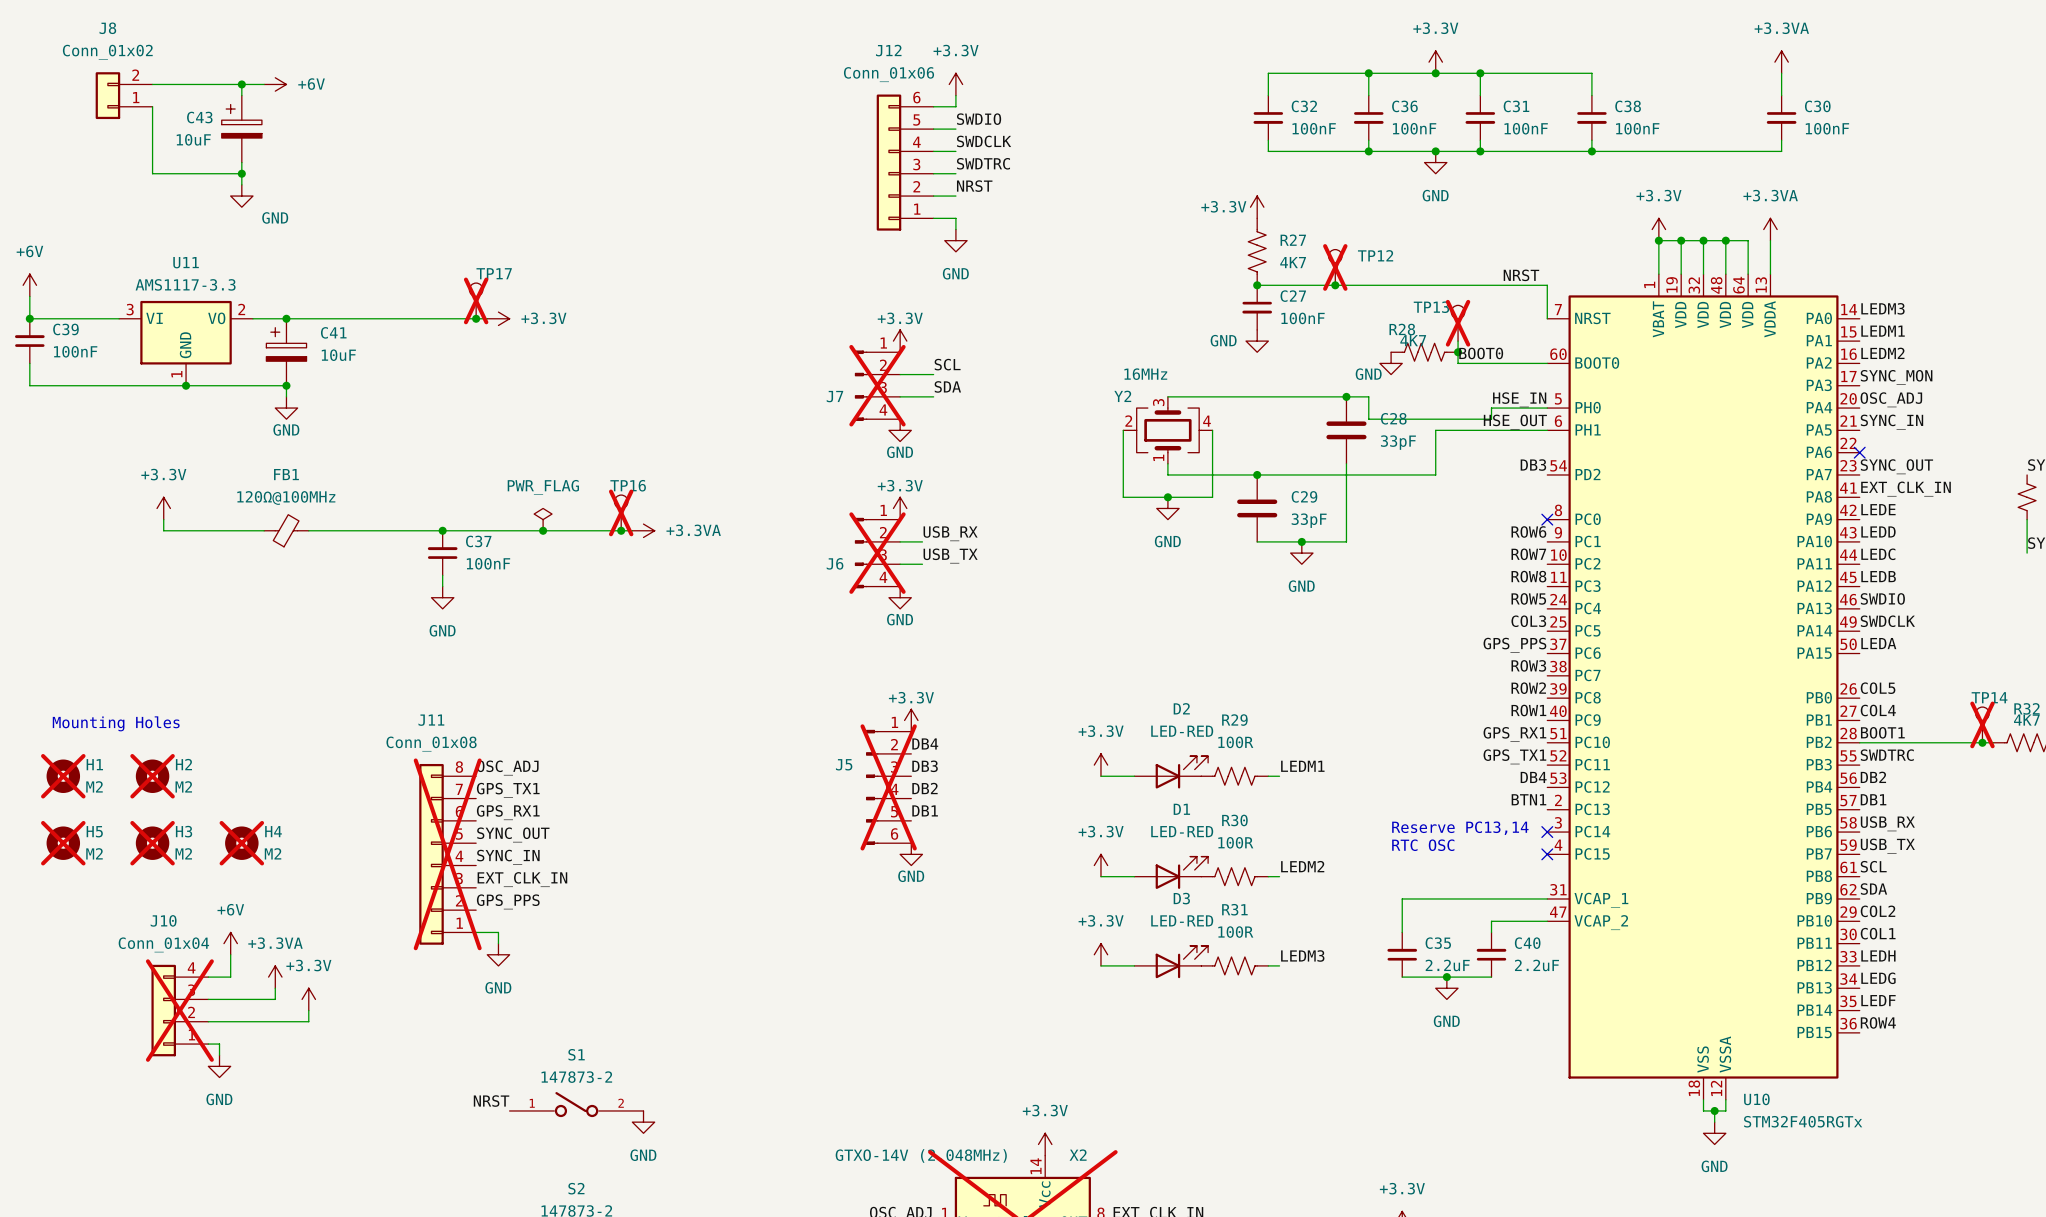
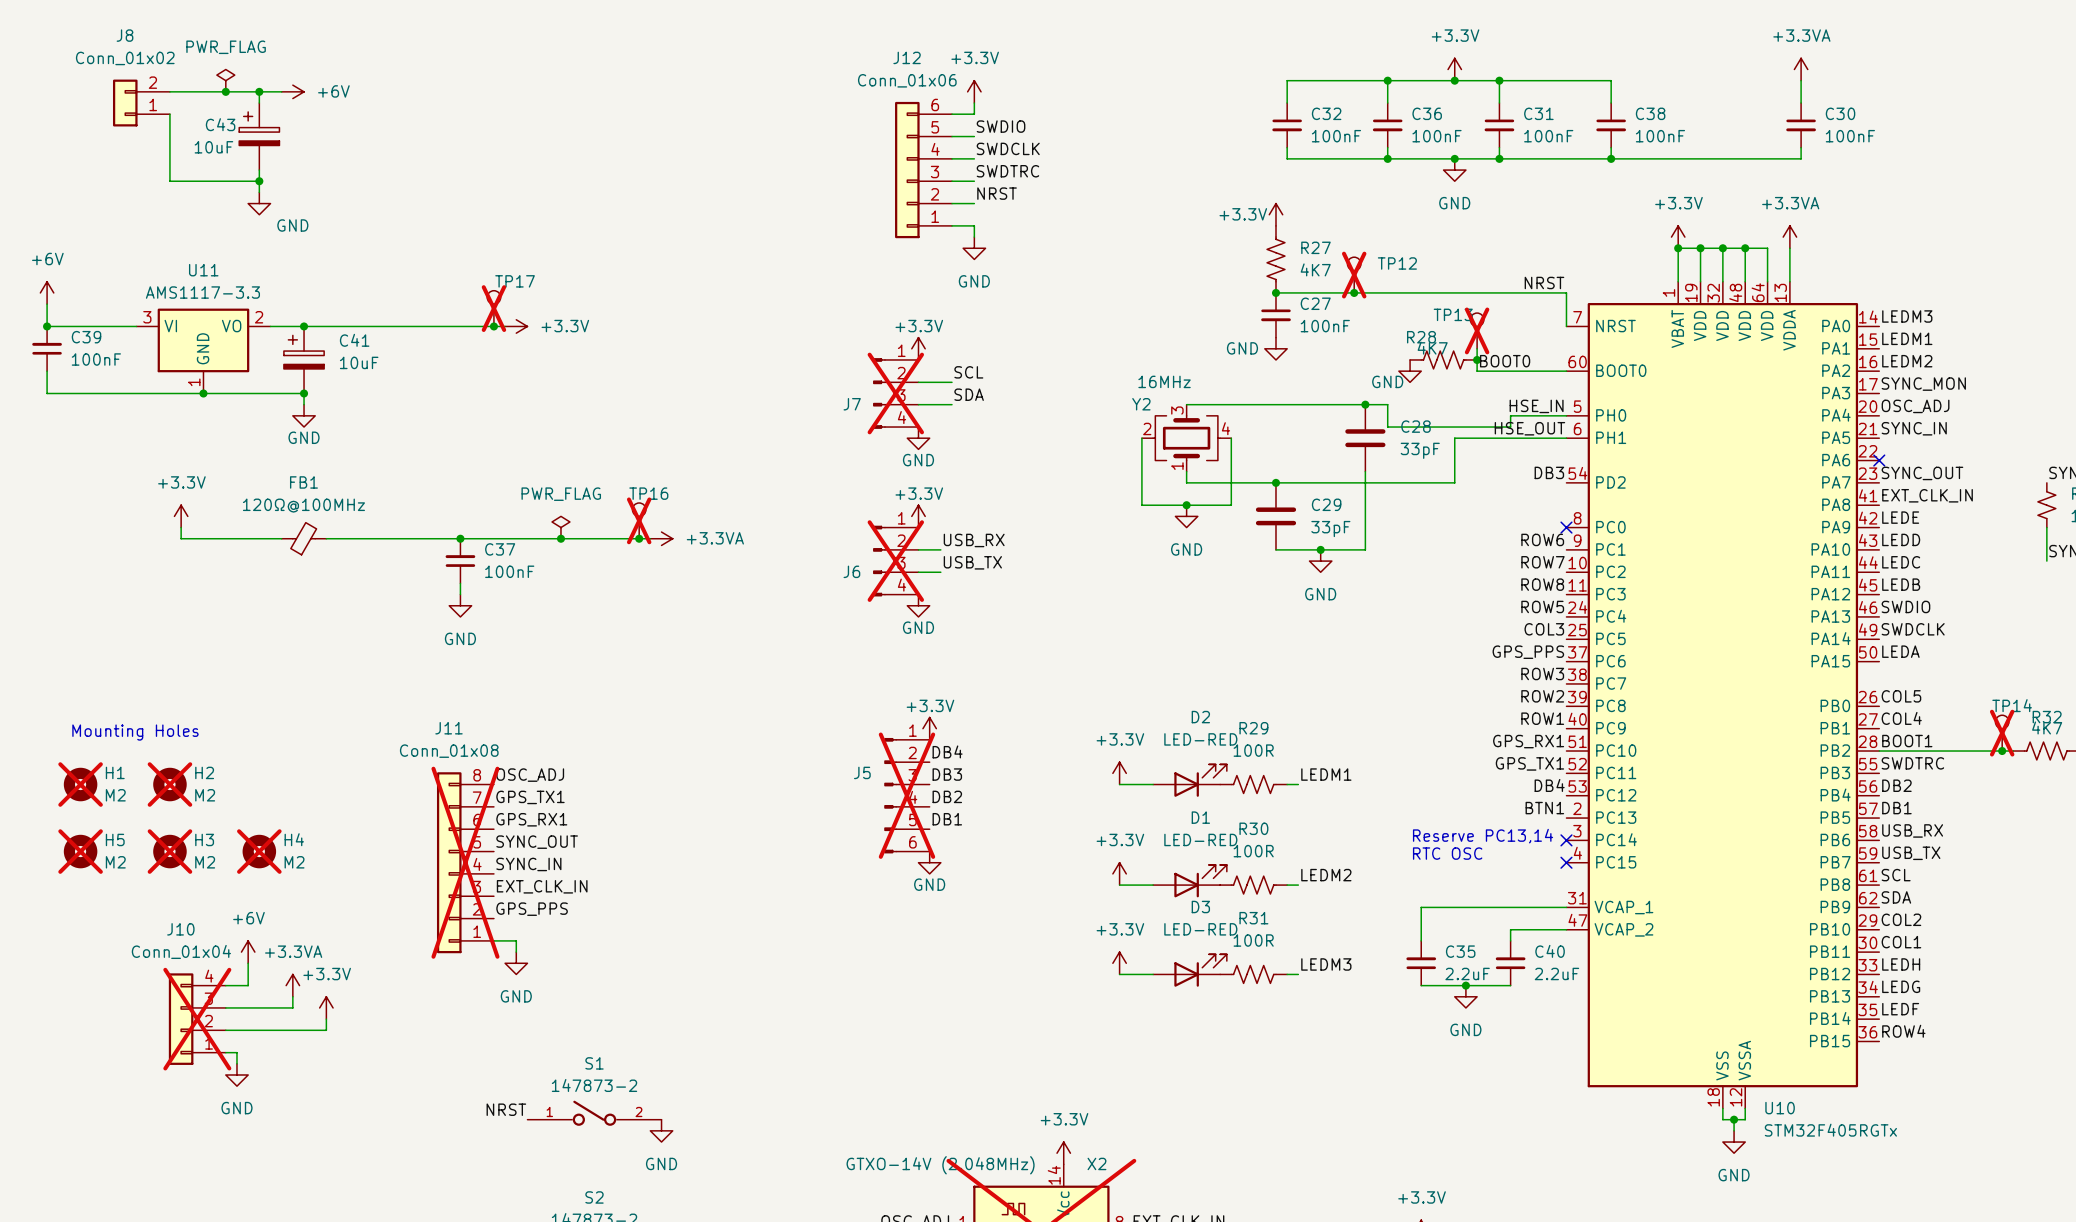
power symbol: none -> PWR_FLAG (225, 80)
junction: none -> (225, 91)

